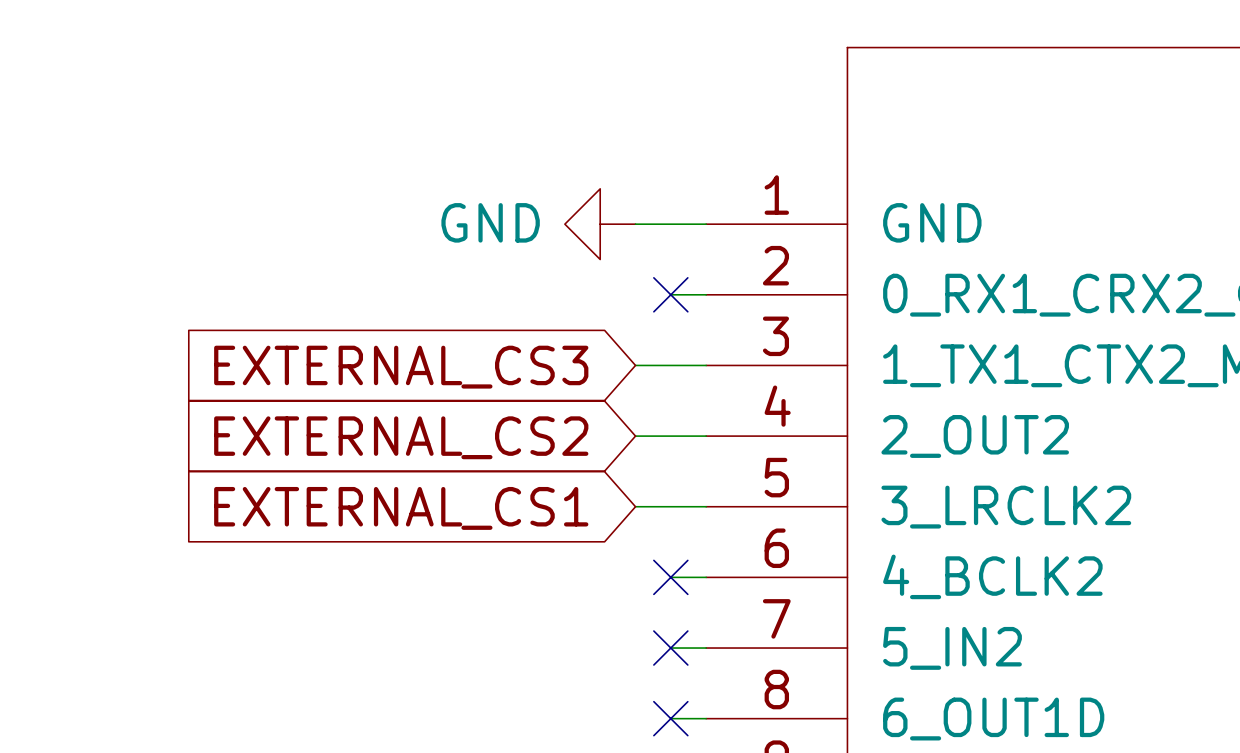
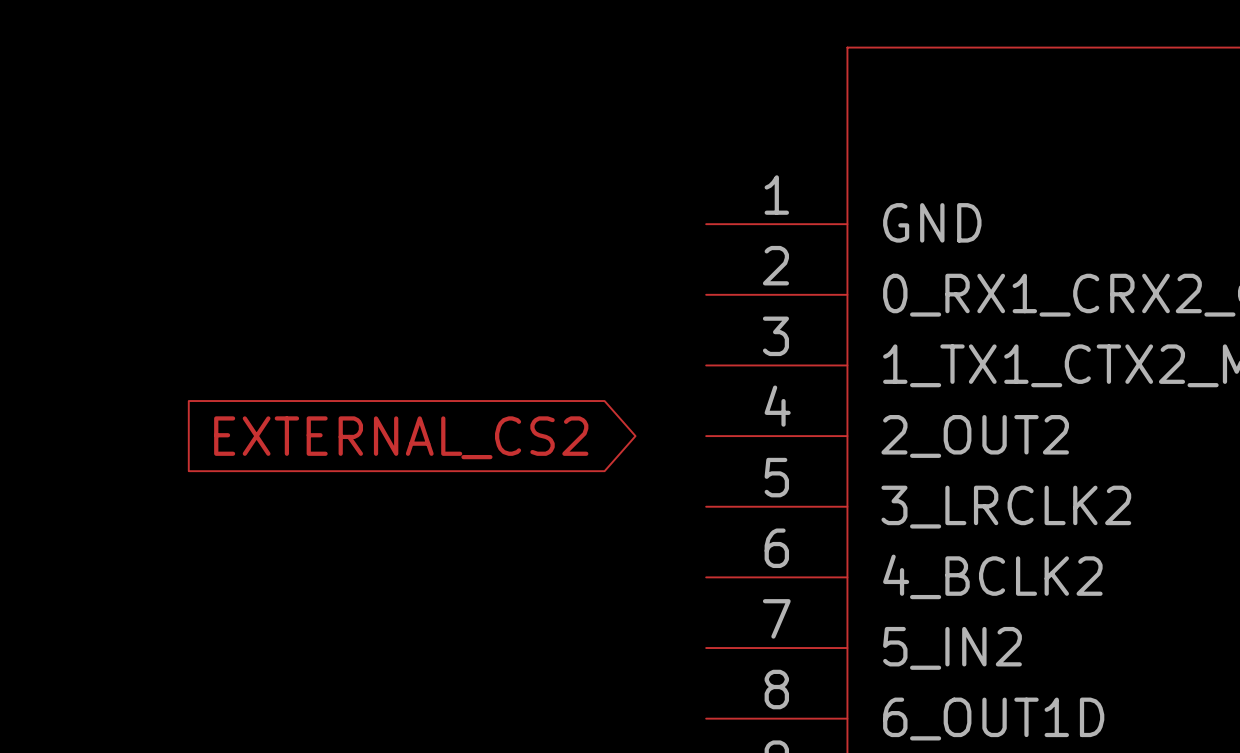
power symbol: GND (600, 224) -> none
wire: (635, 224) (706, 224) -> none
wire: (670, 294) (706, 294) -> none
no-connect mark: (670, 294) -> none
wire: (635, 365) (706, 365) -> none
global label: EXTERNAL_CS3 (401, 367) -> none
wire: (635, 436) (706, 436) -> none
wire: (635, 506) (706, 506) -> none
global label: EXTERNAL_CS1 (401, 508) -> none
wire: (670, 577) (706, 577) -> none
no-connect mark: (670, 577) -> none
wire: (670, 648) (706, 648) -> none
no-connect mark: (670, 648) -> none
wire: (670, 718) (706, 718) -> none
no-connect mark: (670, 718) -> none

